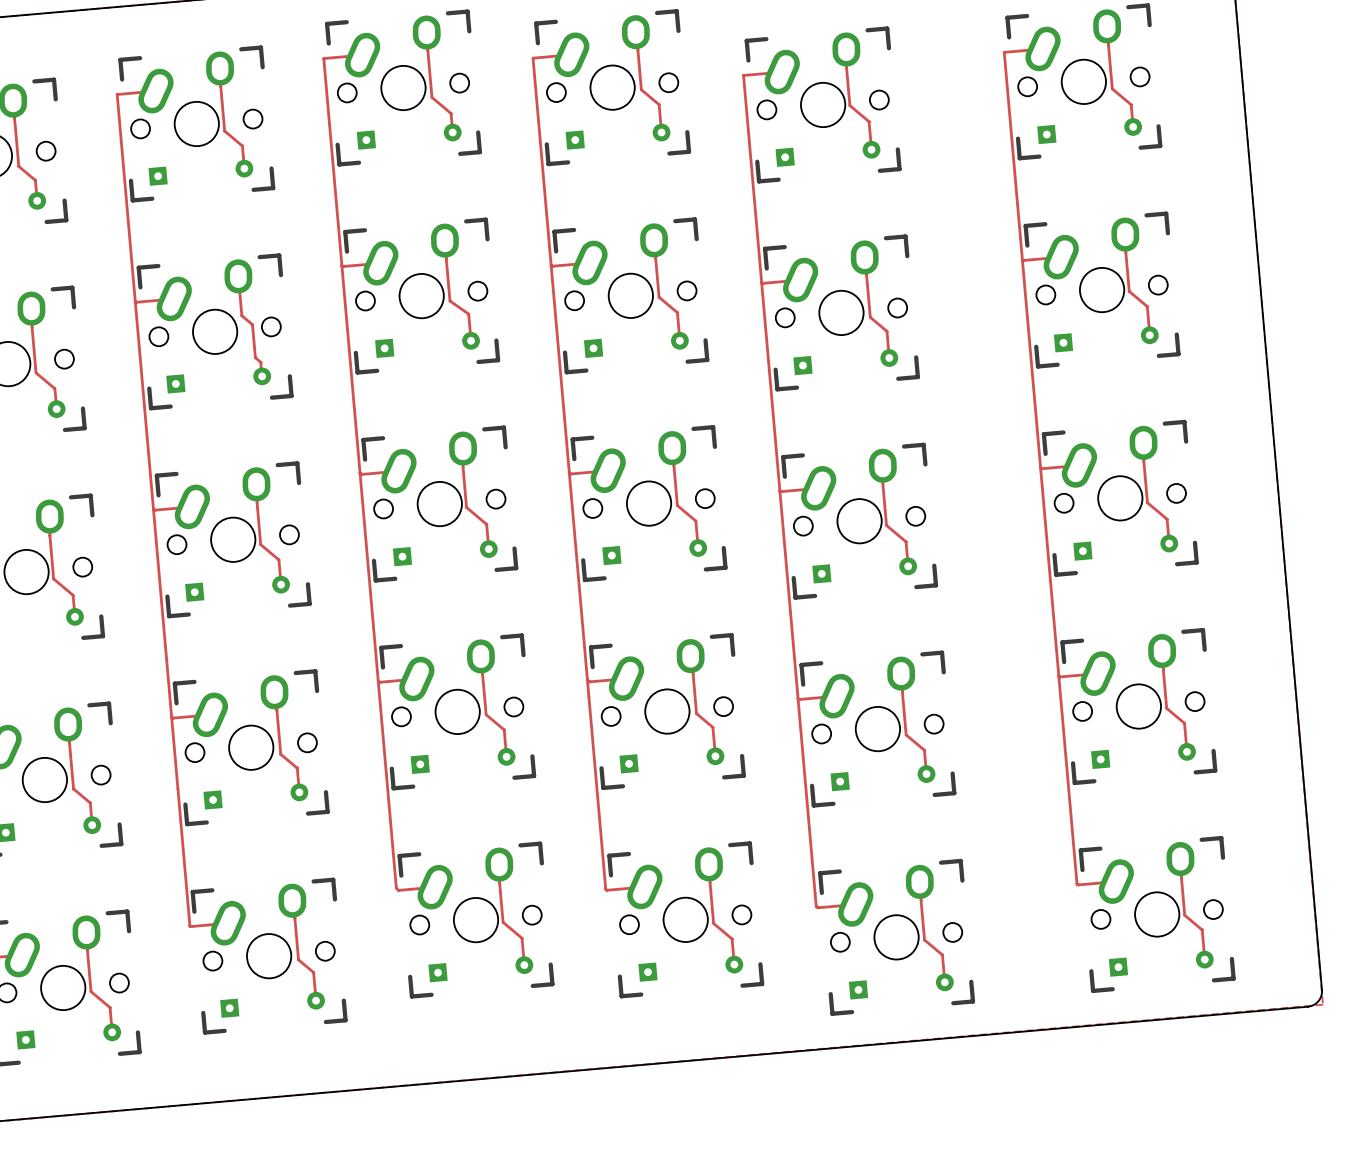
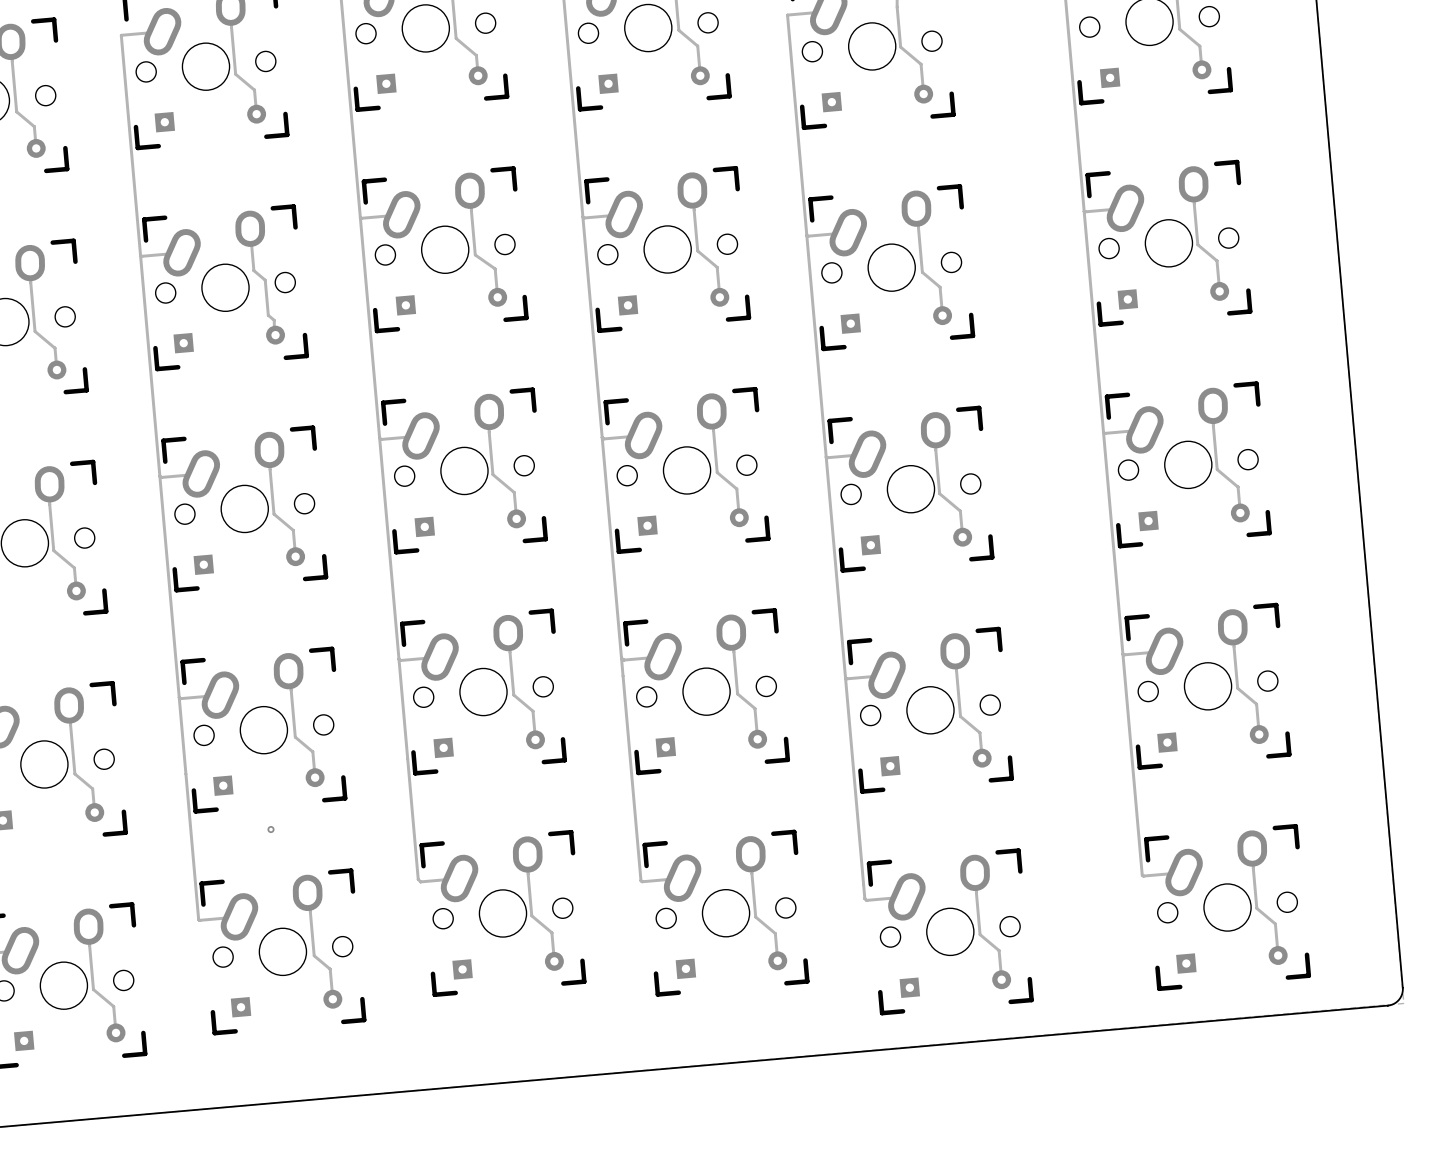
part: none -> (270, 829)

